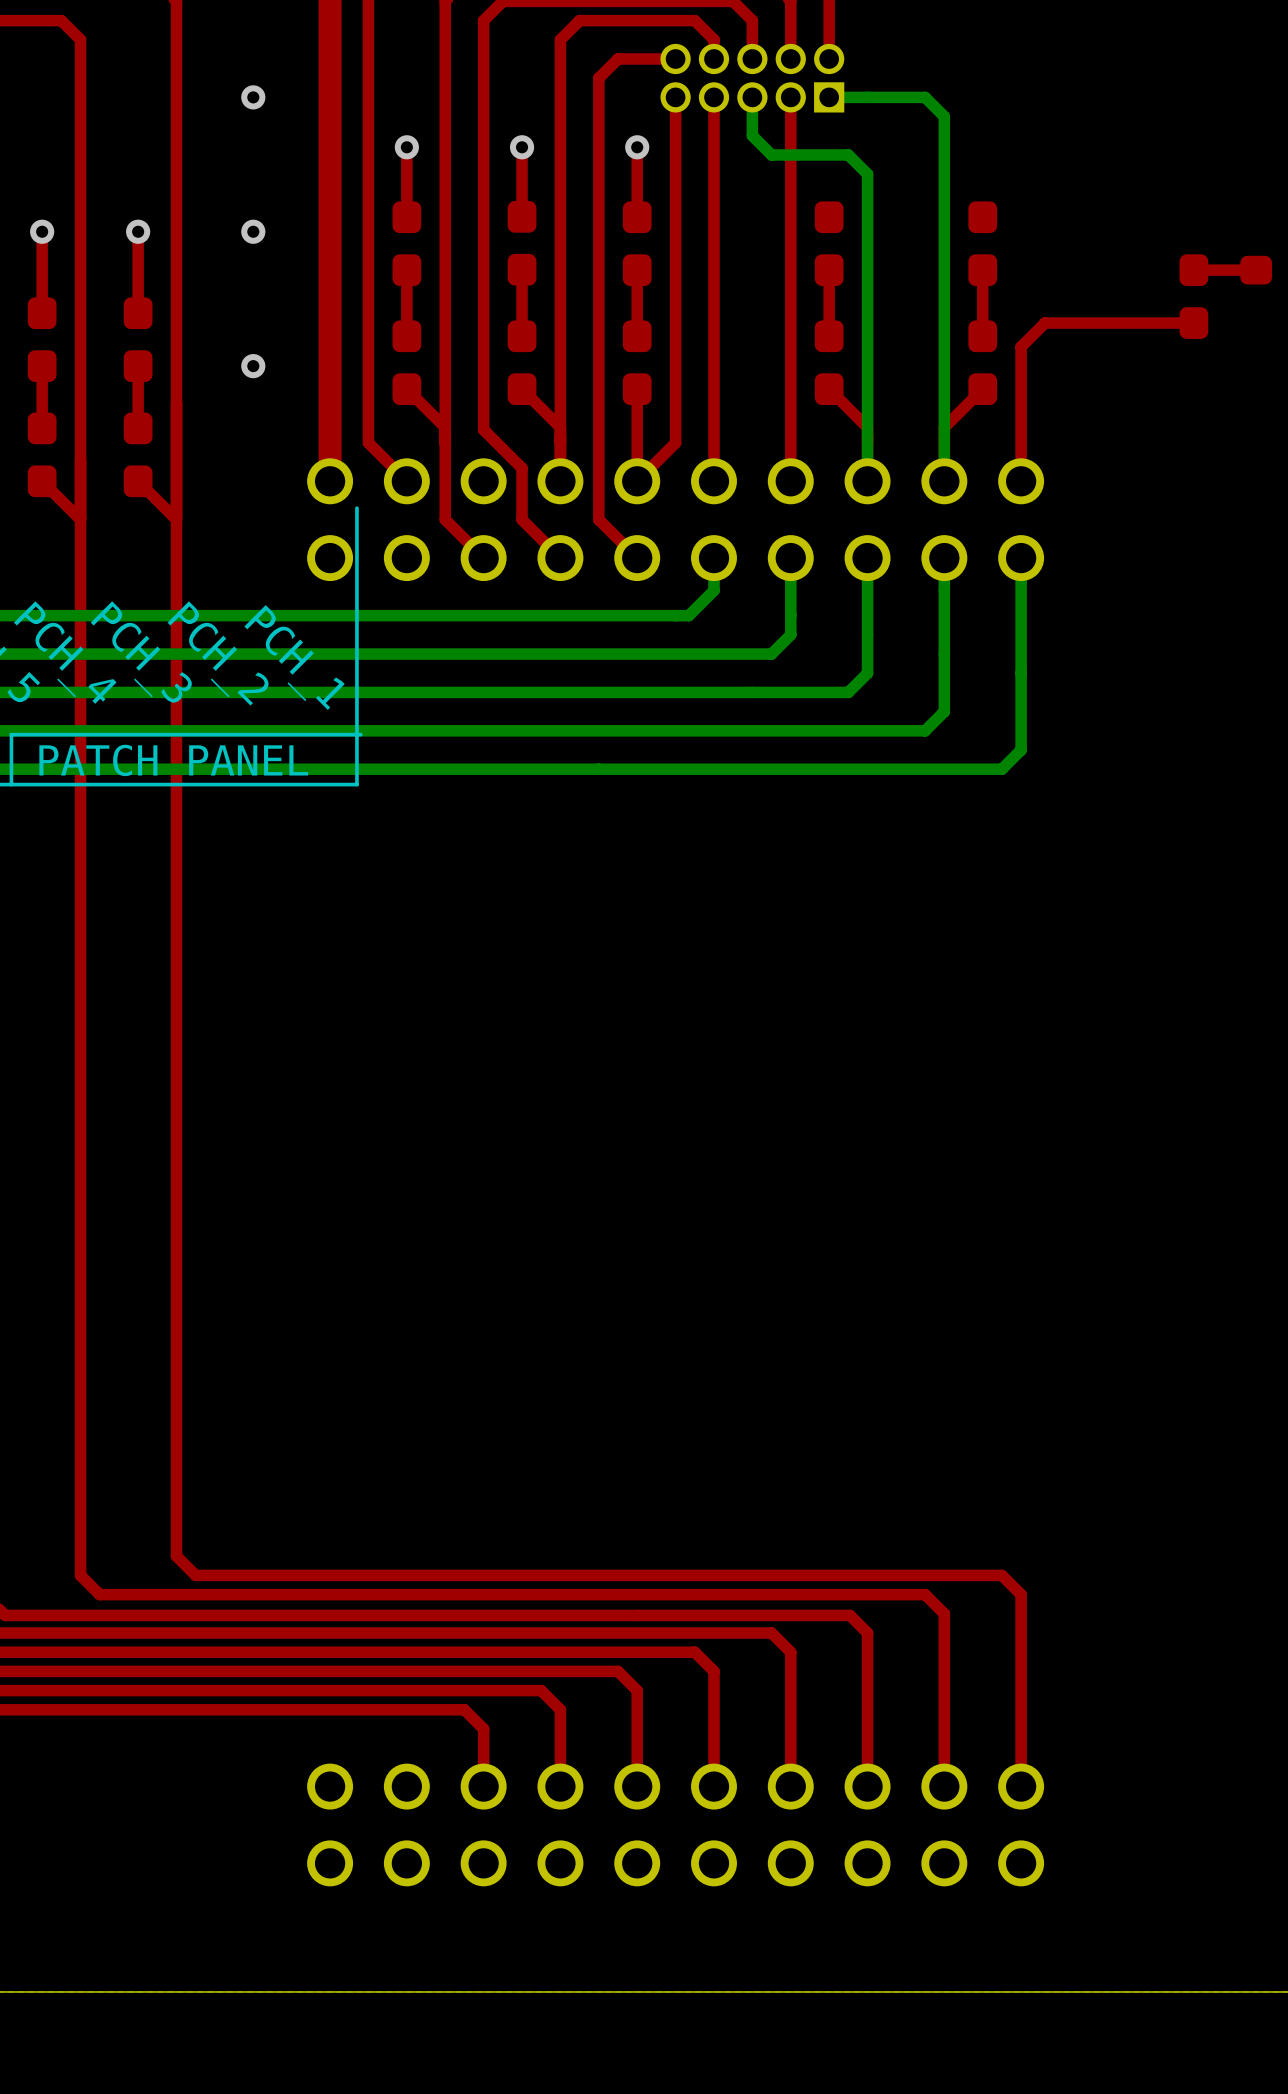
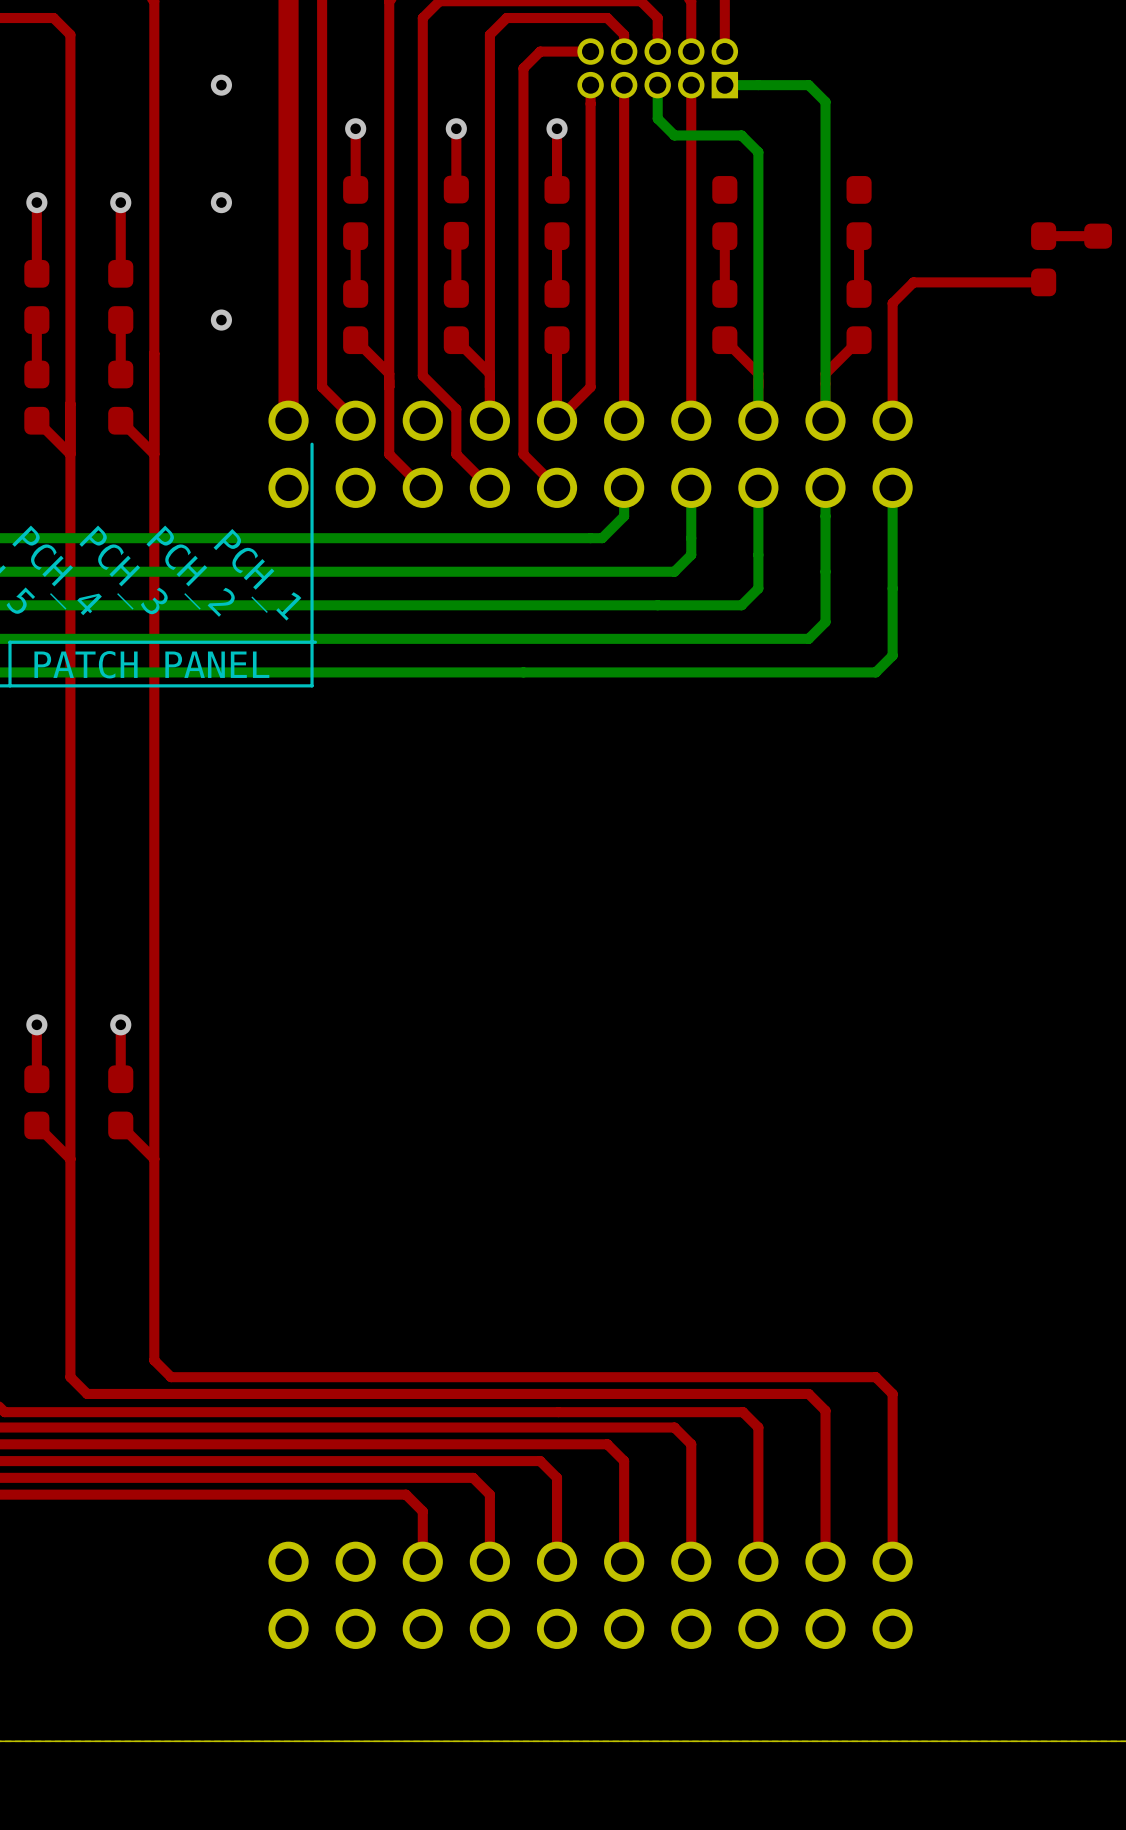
top track: none -> (36, 1024) (36, 1079)
via: none -> (36, 1024)
top track: none -> (120, 1024) (120, 1079)
via: none -> (120, 1024)
part: none -> (36, 1102)
part: none -> (120, 1102)
top track: none -> (36, 1125) (70, 1159)
top track: none -> (120, 1125) (154, 1159)

